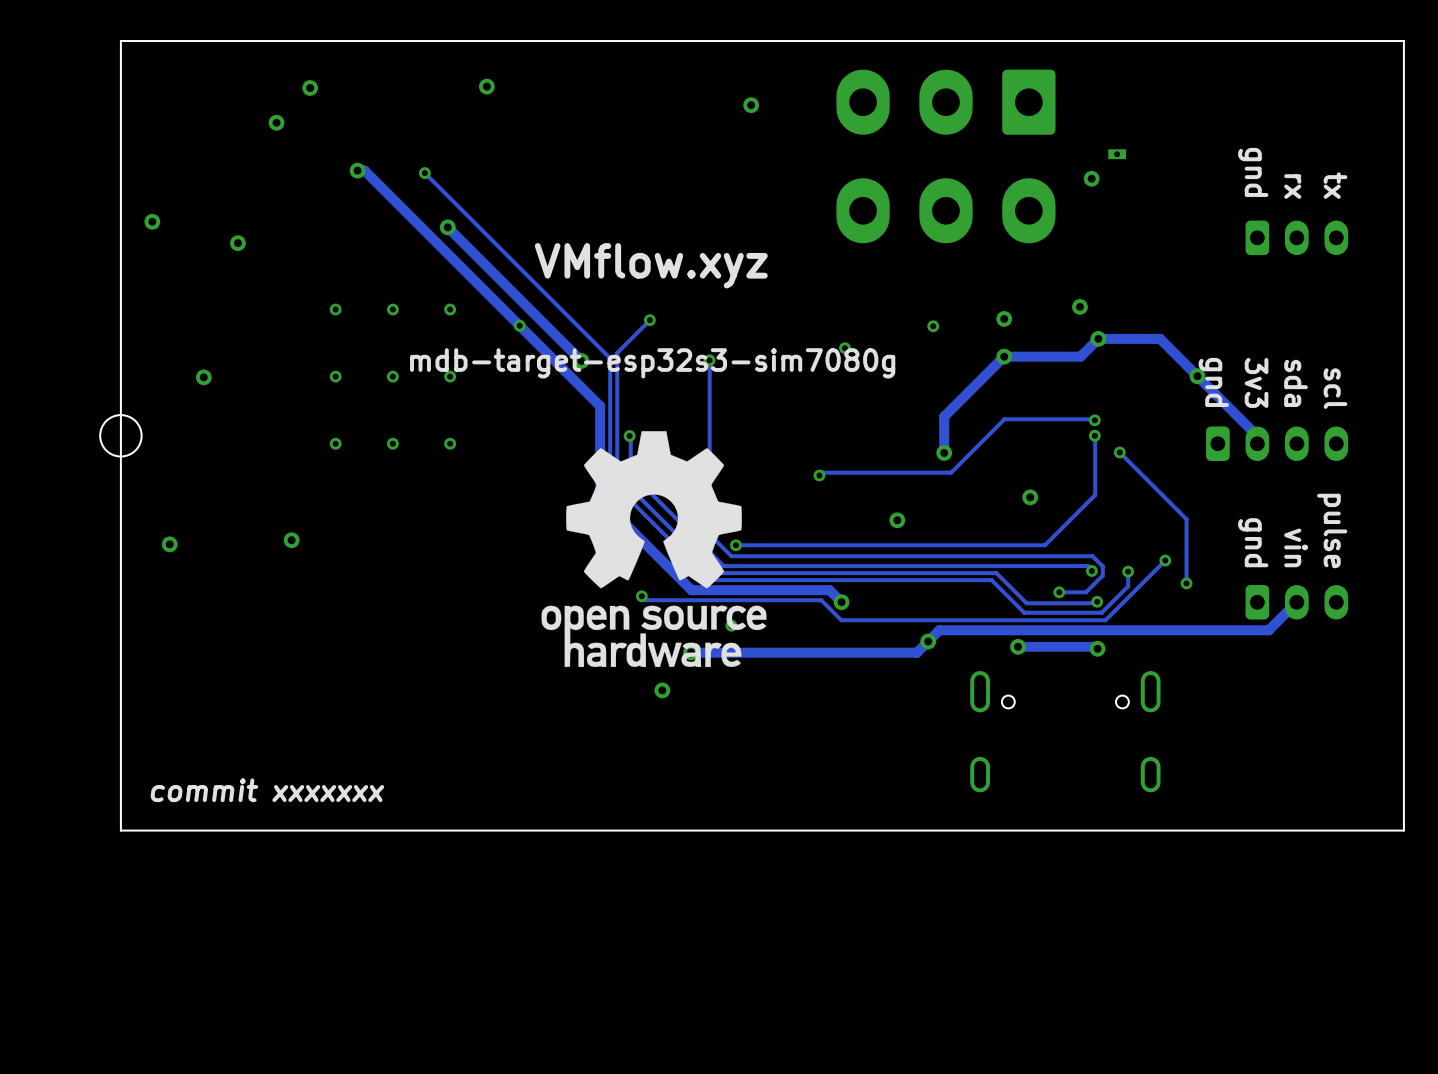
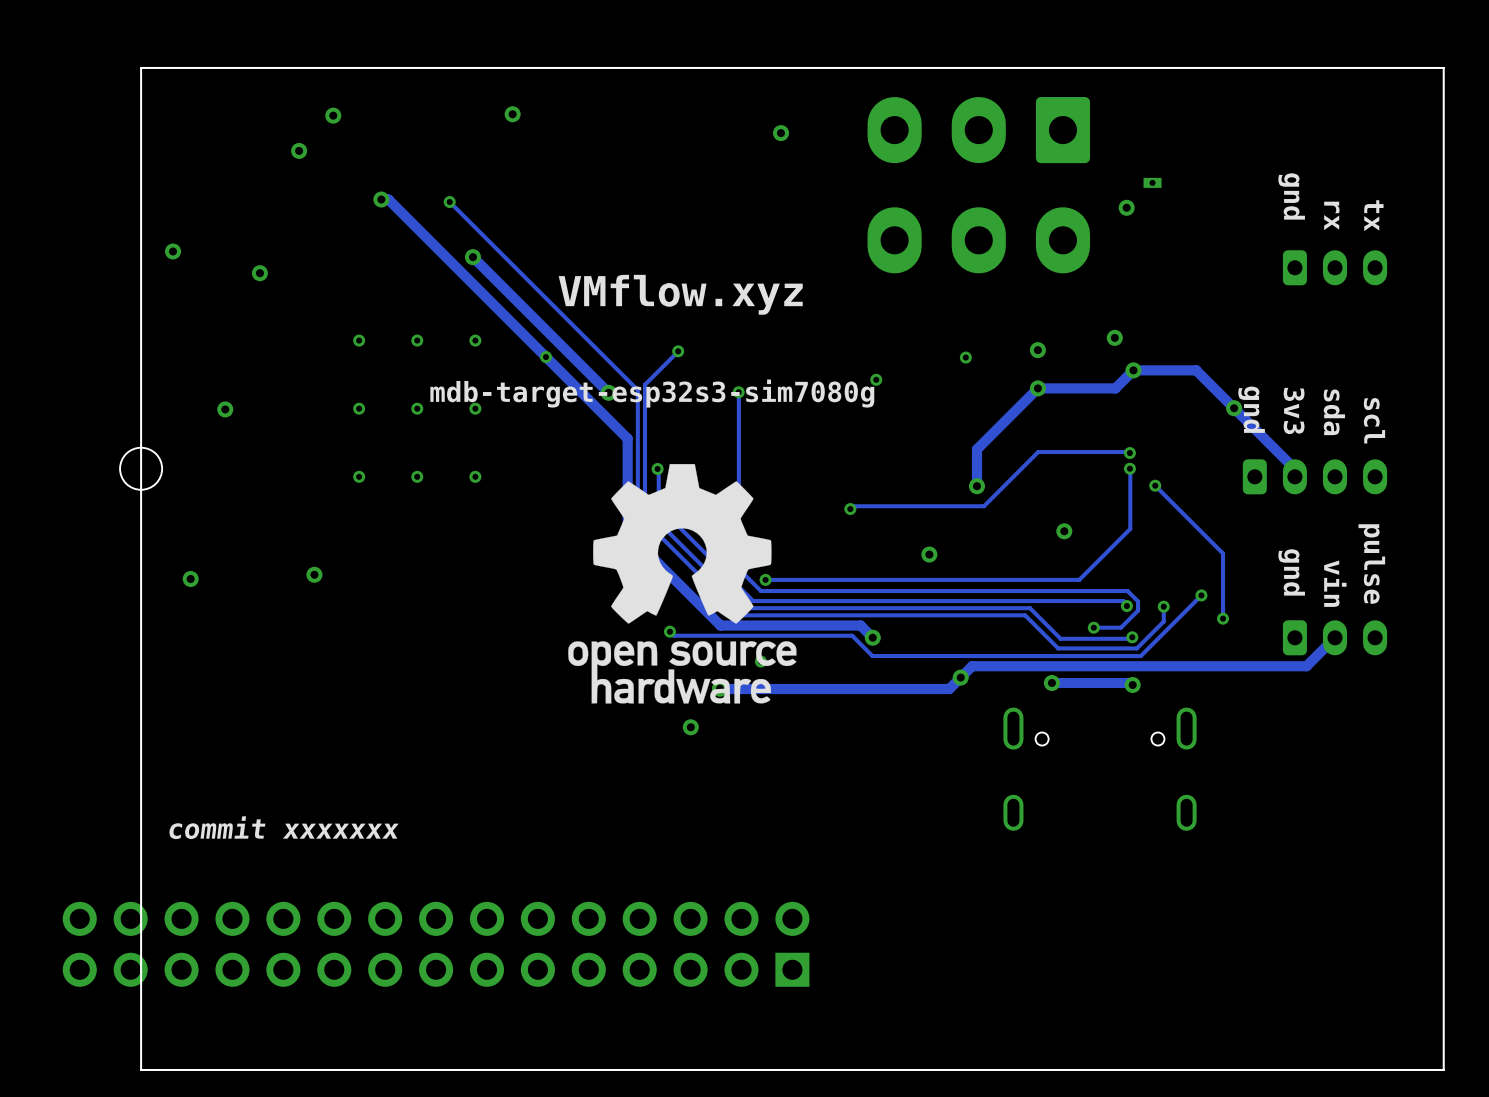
board edge: (1403, 830) (120, 830) -> (1443, 869) (1443, 1069) (141, 1069) (141, 869)
part: none -> (436, 944)

